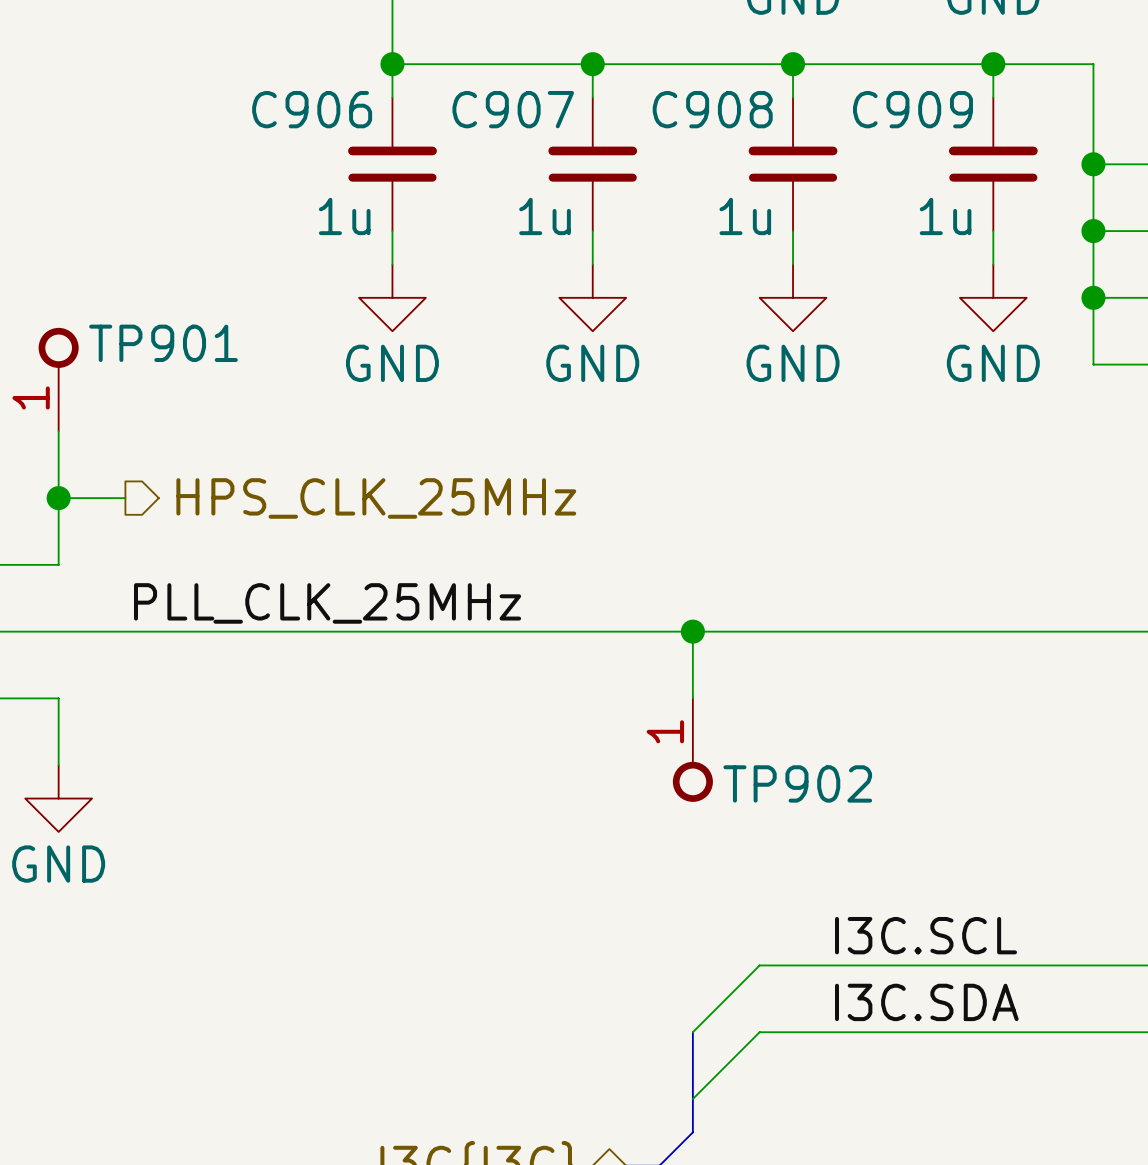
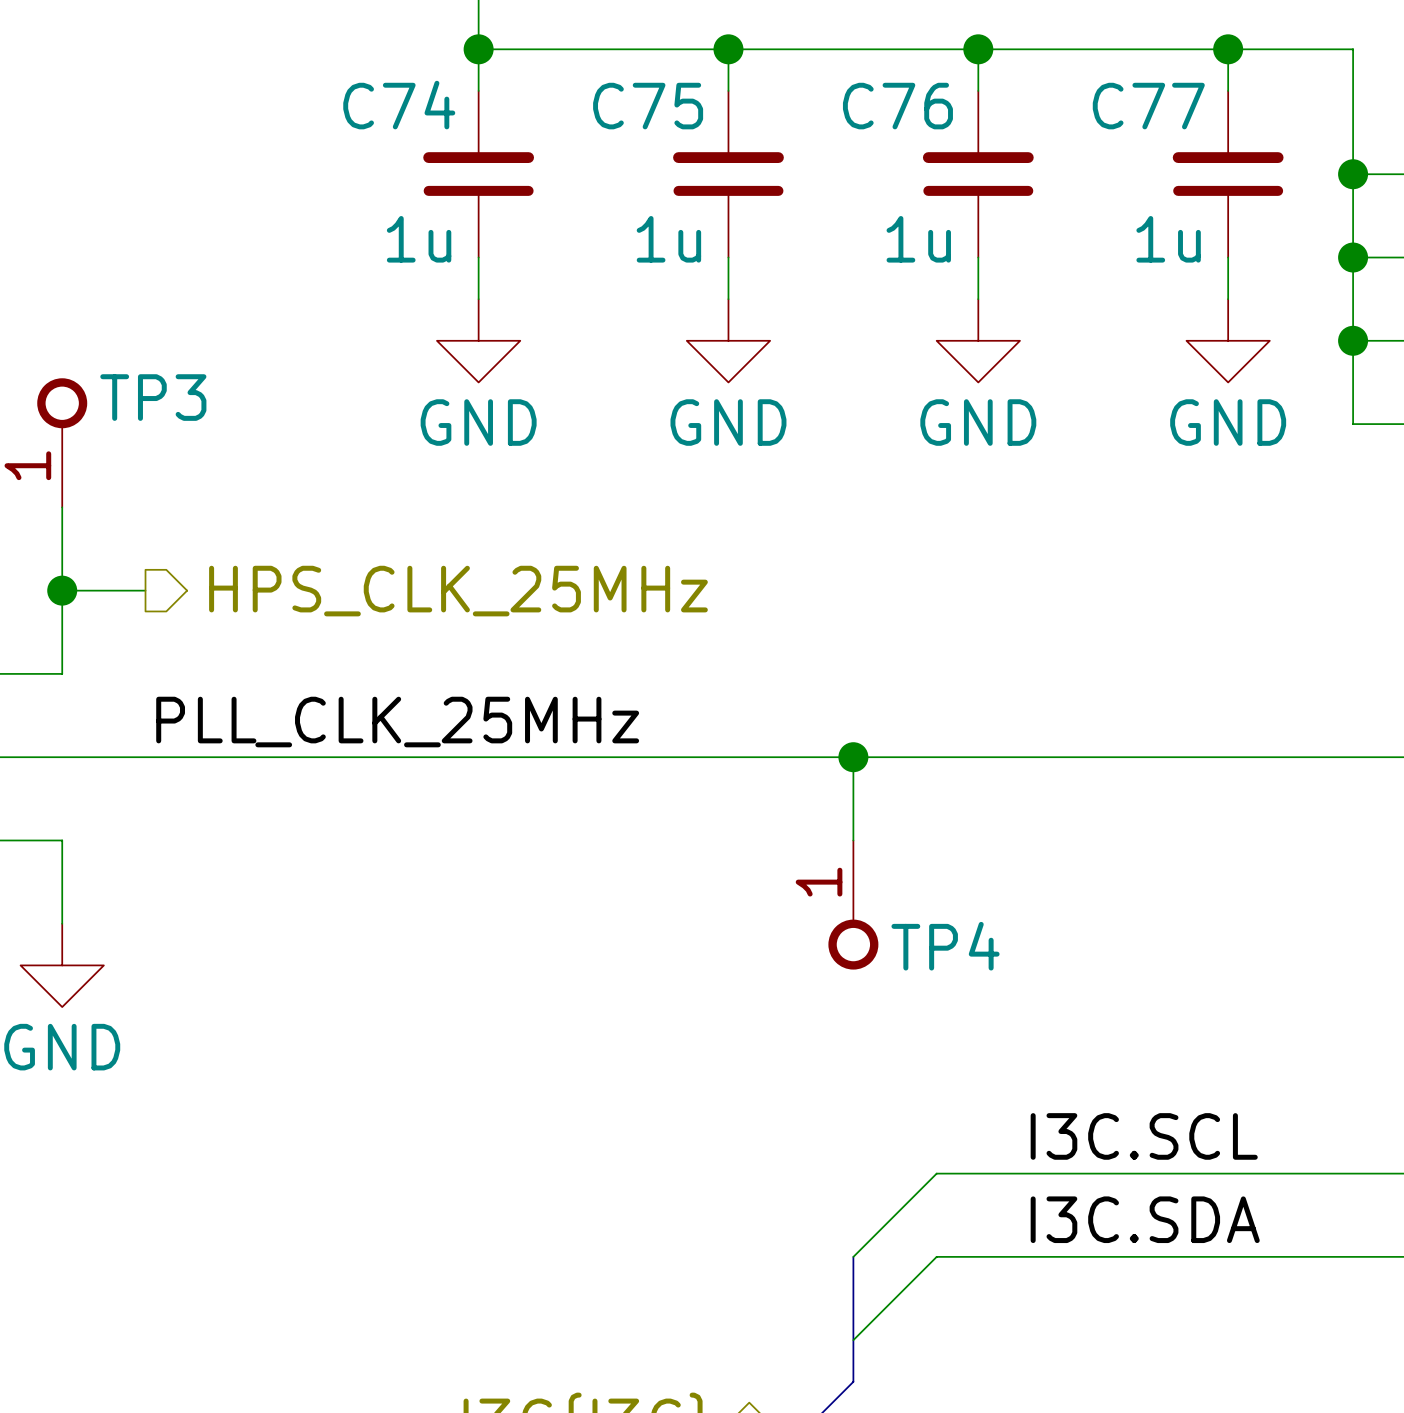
C906 name: C906 (312, 109) -> C74 (399, 105)
C907 name: C907 (513, 109) -> C75 (648, 106)
C908 name: C908 (712, 109) -> C76 (897, 106)
C909 name: C909 (912, 109) -> C77 (1148, 106)
TP901 name: TP901 (163, 343) -> TP3 (153, 397)
TP902 name: TP902 (797, 783) -> TP4 (945, 946)

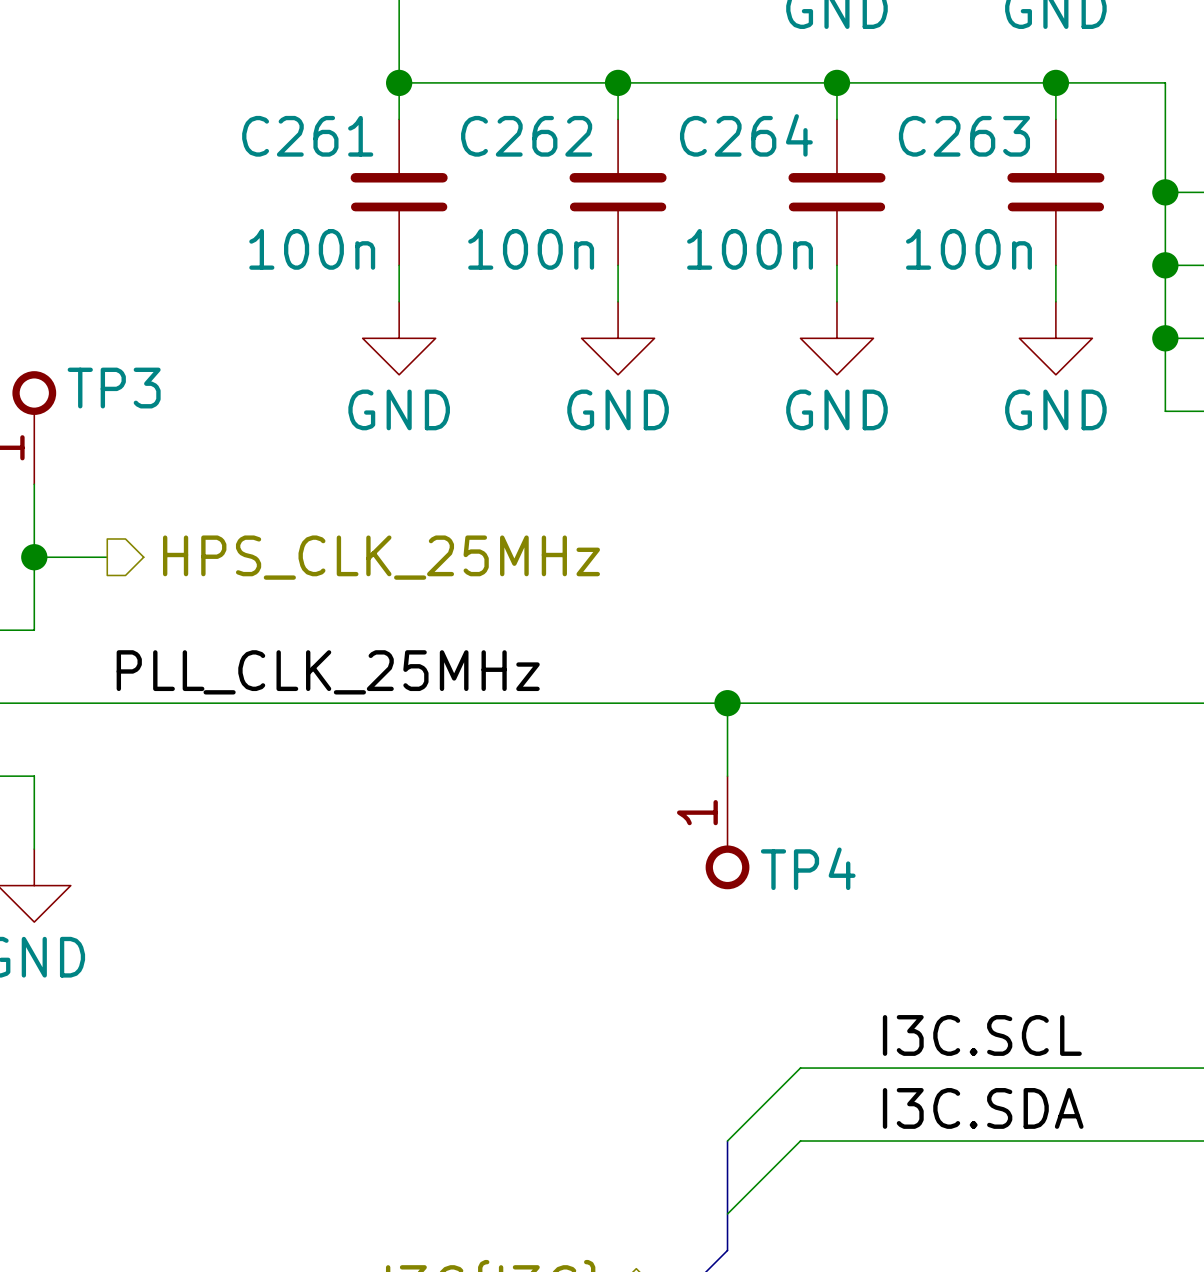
C74 name: C74 (399, 105) -> C261 (307, 136)
C75 name: C75 (648, 106) -> C262 (526, 136)
C76 name: C76 (897, 106) -> C264 (746, 135)
C77 name: C77 (1148, 106) -> C263 (964, 136)
C74 text: 1u (419, 239) -> 100n (312, 249)
C75 text: 1u (668, 239) -> 100n (531, 249)
C76 text: 1u (918, 239) -> 100n (750, 249)
C77 text: 1u (1168, 239) -> 100n (968, 249)

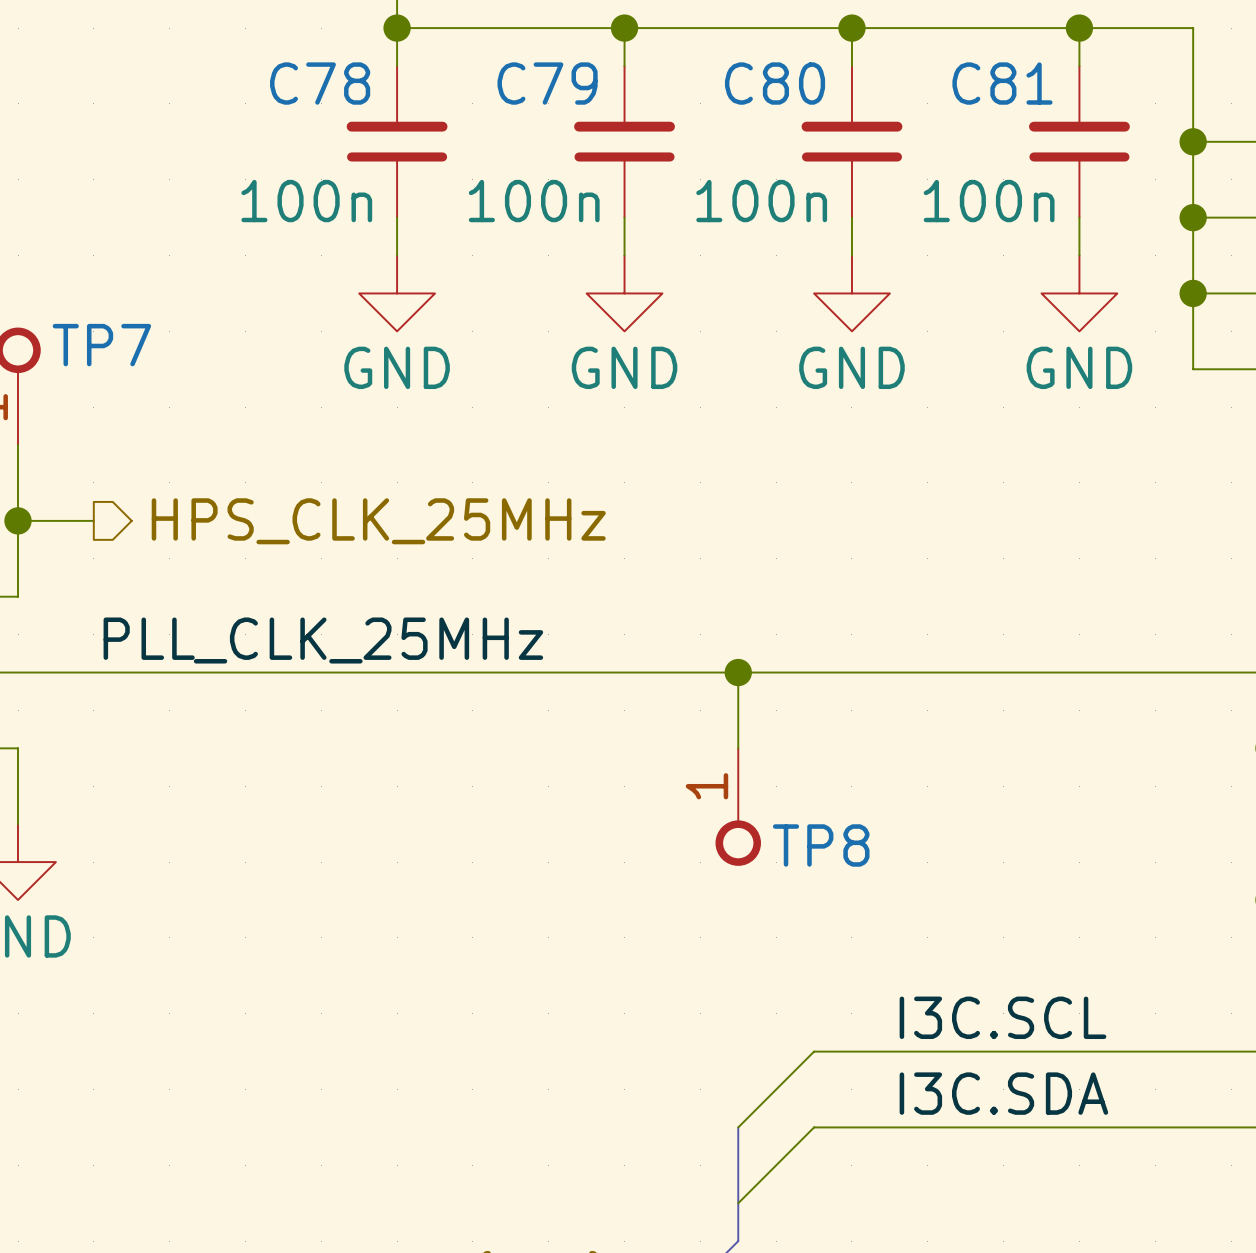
C264 name: C264 (746, 135) -> C80 (775, 83)
C261 name: C261 (307, 136) -> C78 (320, 83)
C262 name: C262 (526, 136) -> C79 (547, 83)
C263 name: C263 (964, 136) -> C81 (1002, 83)
TP3 name: TP3 (114, 388) -> TP7 (101, 345)
TP4 name: TP4 (808, 868) -> TP8 (821, 845)

